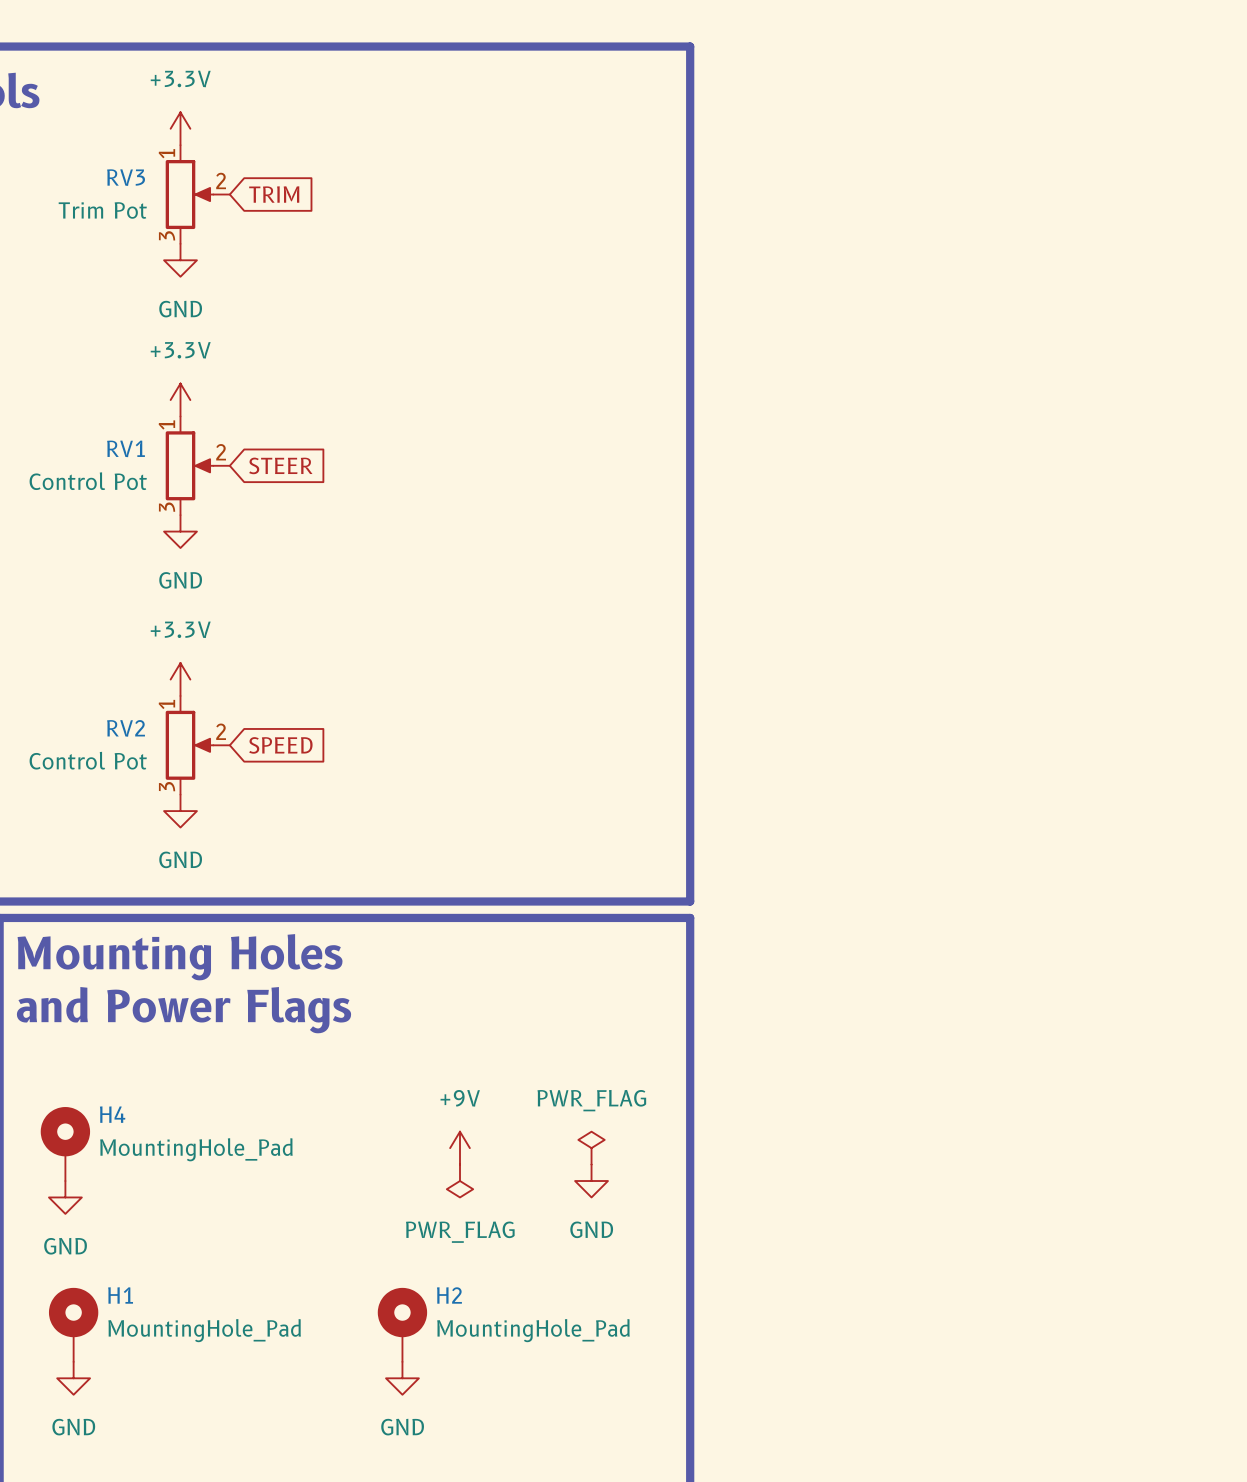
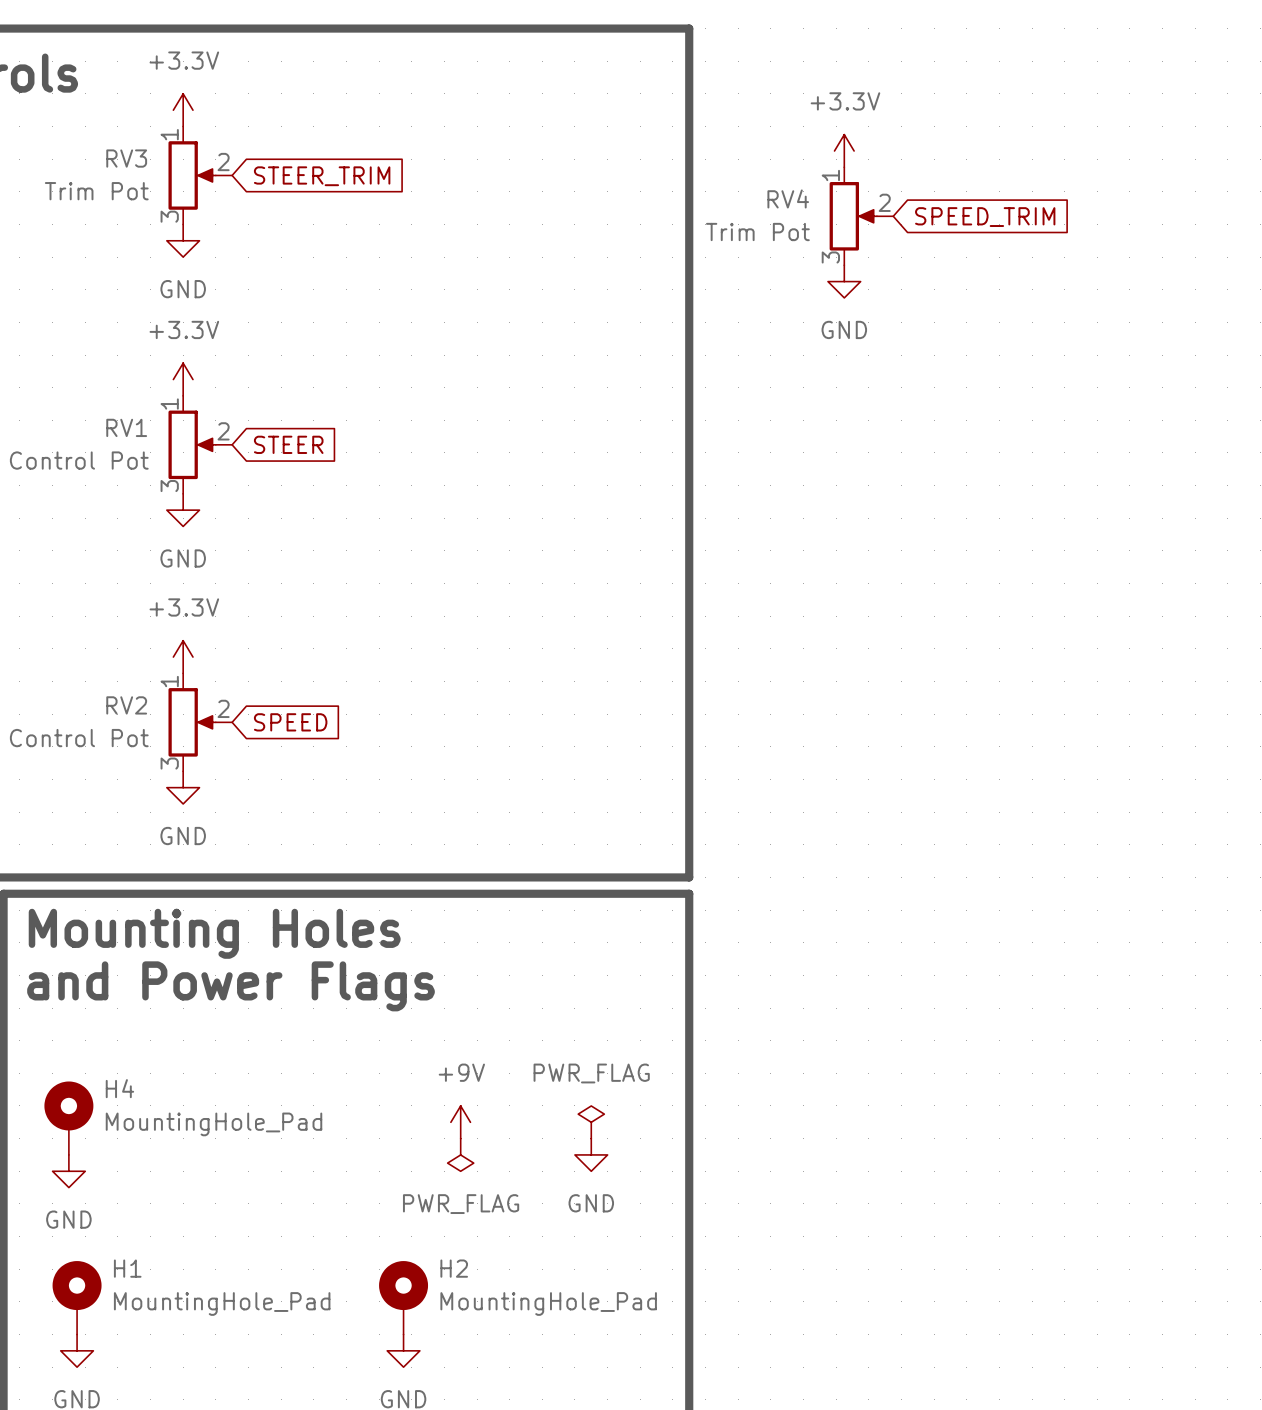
power symbol: none -> +3.3V (844, 150)
global label: TRIM (274, 194) -> STEER_TRIM (322, 176)
RV4: none -> Trim Pot (861, 216)
global label: none -> SPEED_TRIM (985, 217)
power symbol: none -> GND (844, 281)

